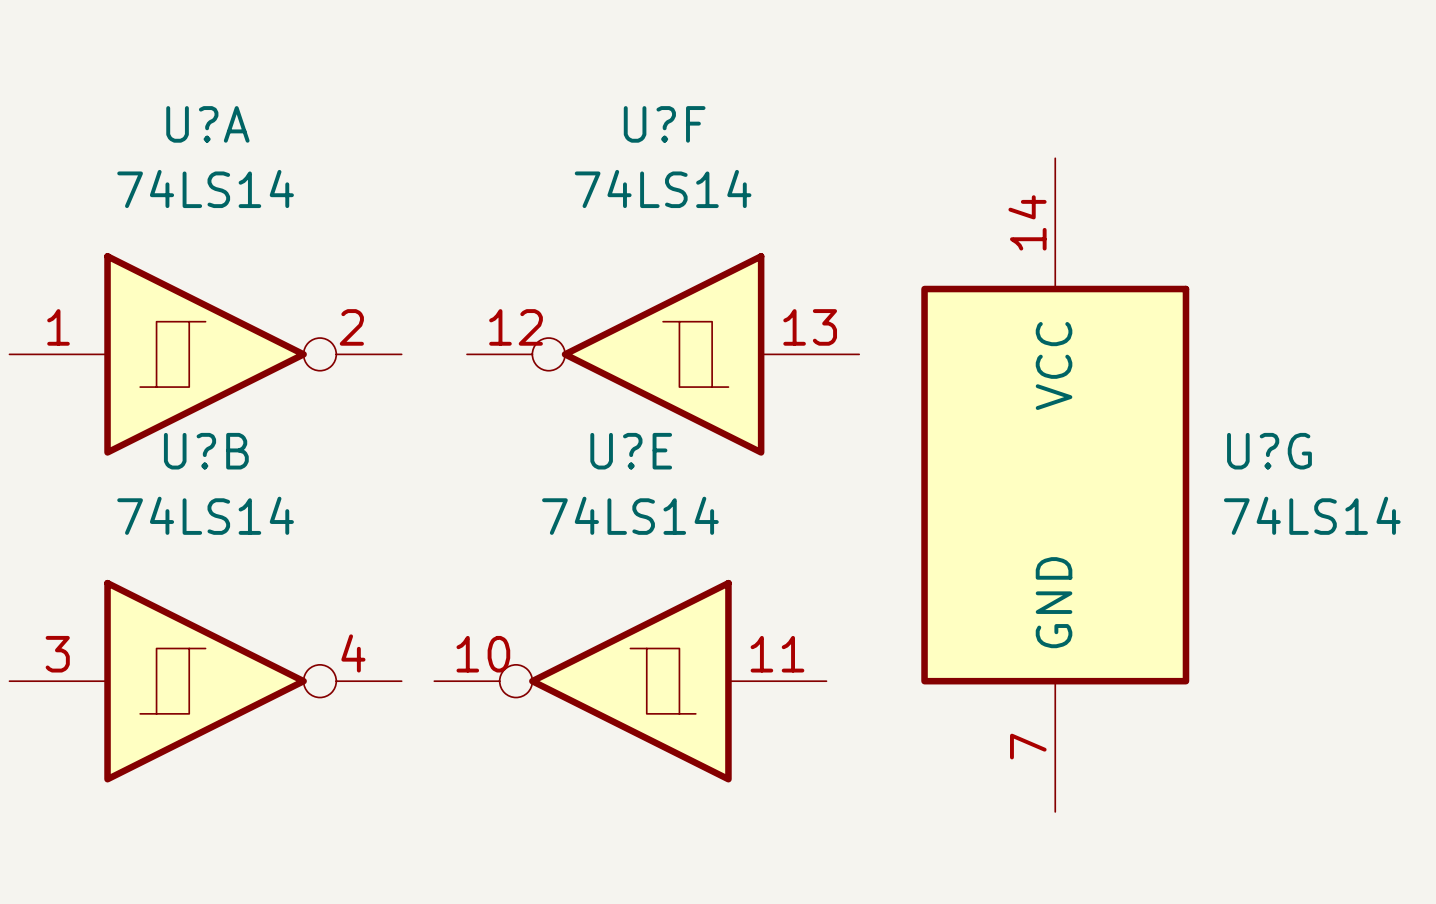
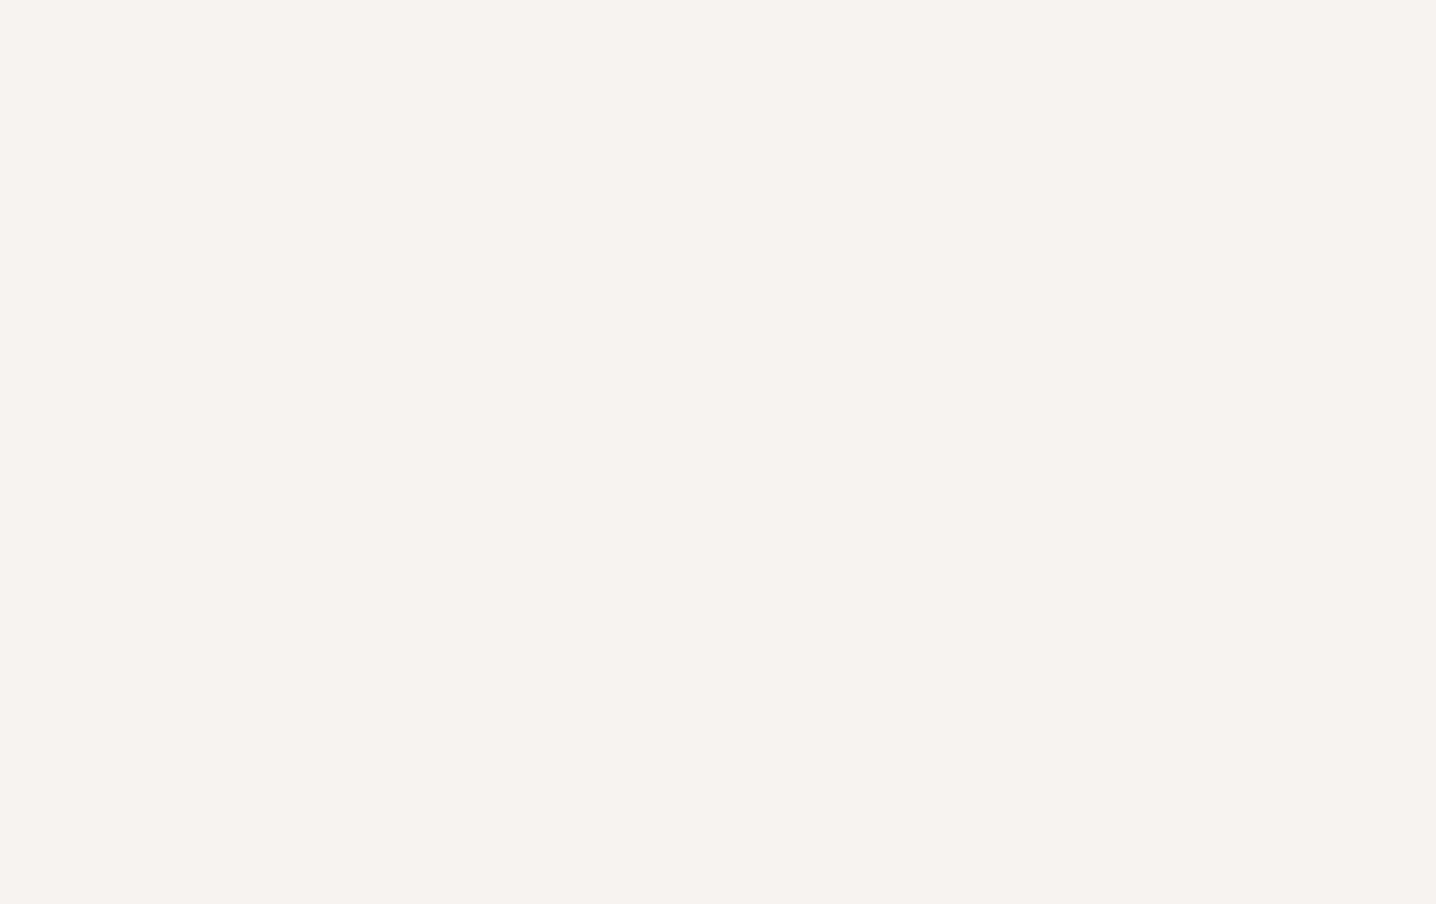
U?A: 74LS14 (205, 354) -> none
U?F: 74LS14 (663, 354) -> none
U?G: 74LS14 (1055, 485) -> none
U?B: 74LS14 (205, 681) -> none
U?E: 74LS14 (630, 681) -> none

